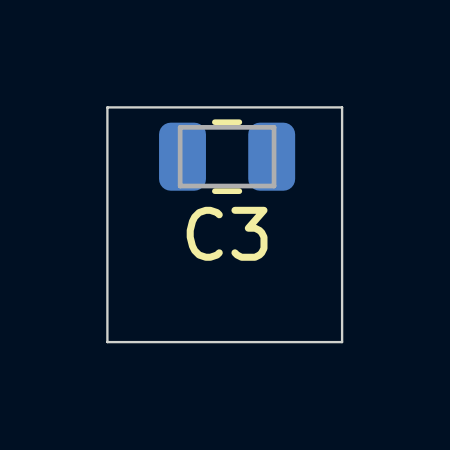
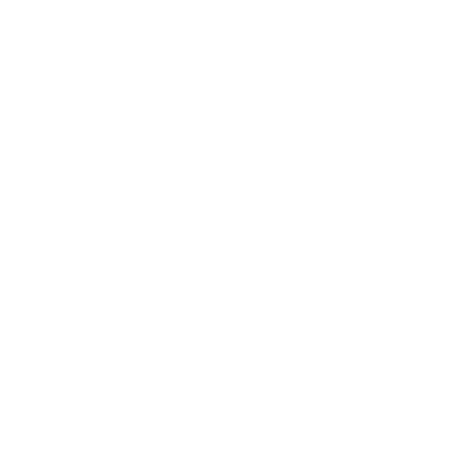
board edge: (342, 107) (107, 107) (107, 342) (342, 342) (342, 107) -> none
C3: (227, 156) -> none

